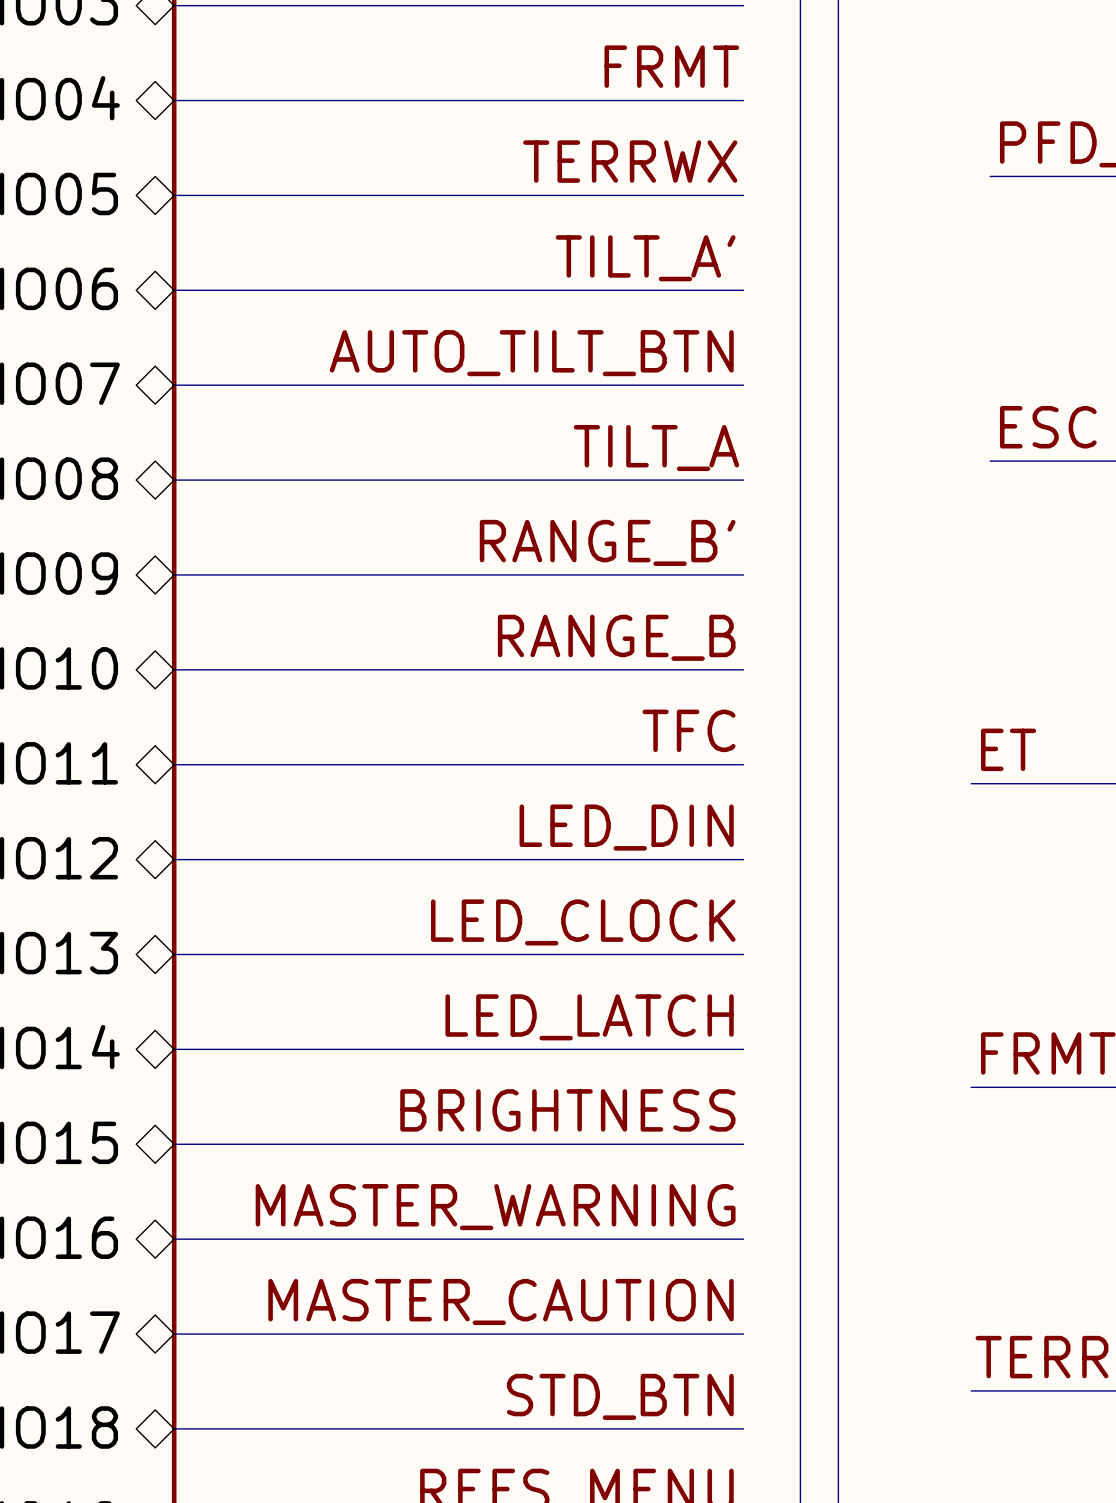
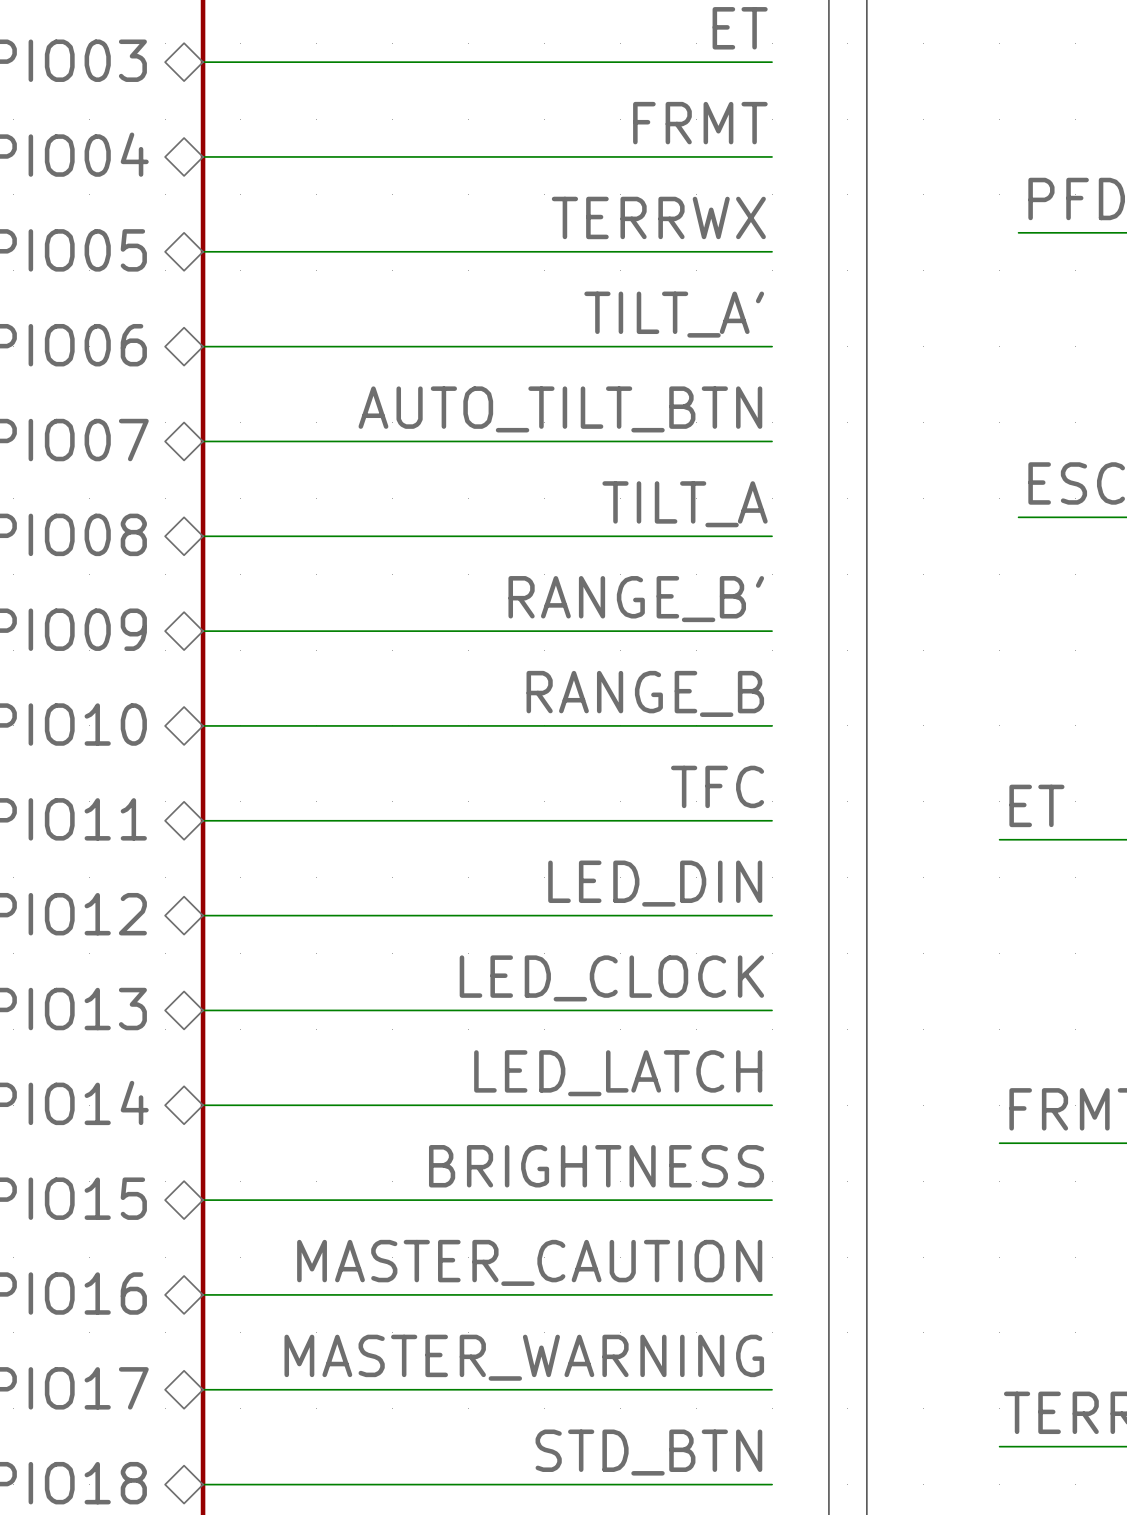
label: MASTER_WARNING (495, 1207) -> MASTER_CAUTION (529, 1262)
label: MASTER_CAUTION (501, 1301) -> MASTER_WARNING (524, 1357)

